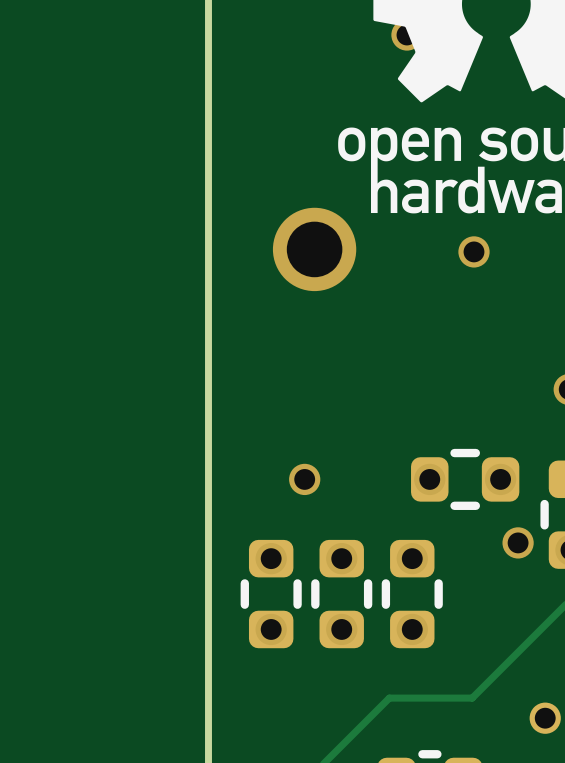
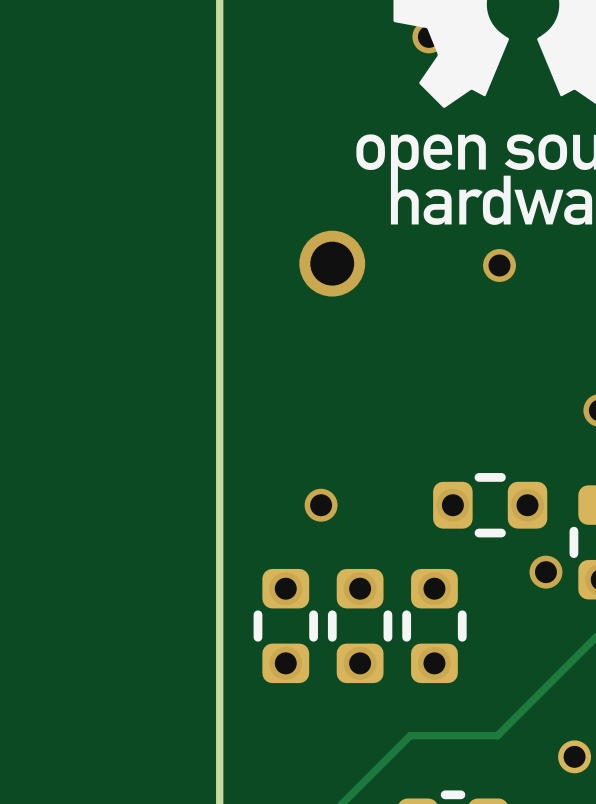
via size: [272, 207, 357, 292] -> [299, 230, 366, 297]

